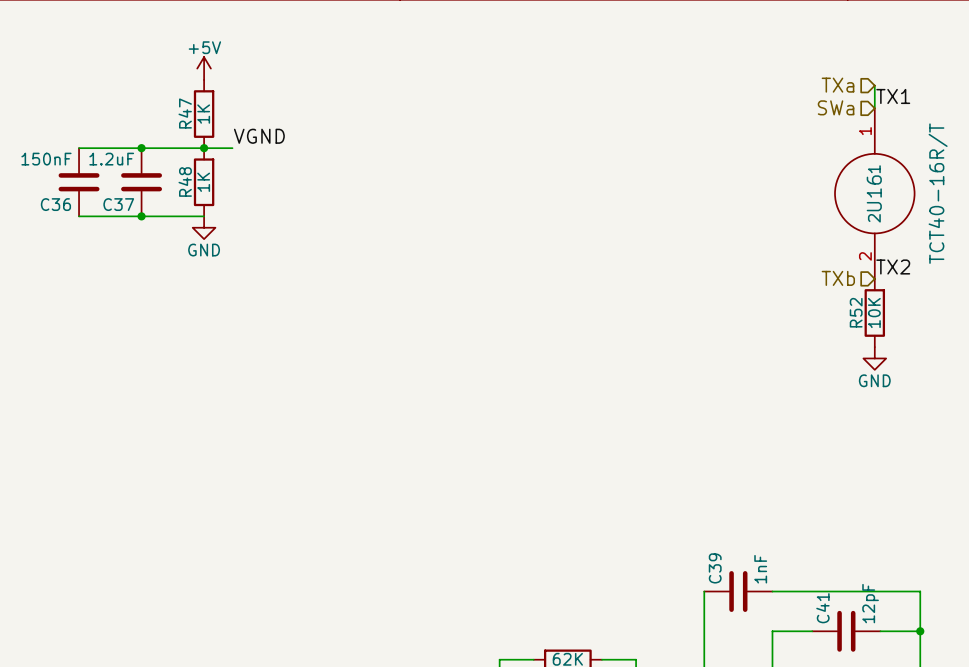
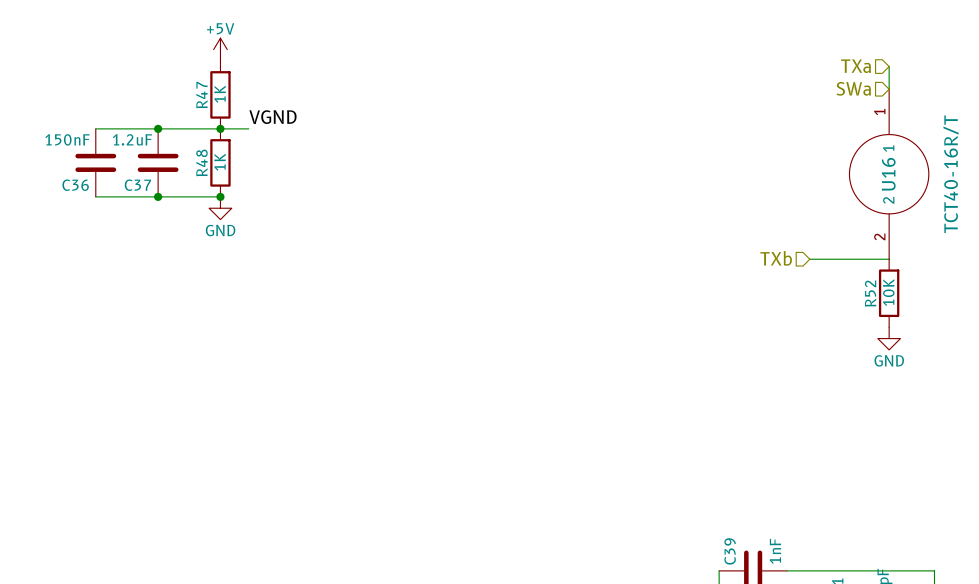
label: TX1 (893, 96) -> none
junction: none -> (220, 196)
label: TX2 (893, 266) -> none
wire: none -> (809, 259) (889, 259)
hierarchical label position: TXb (838, 278) -> TXb (776, 258)

